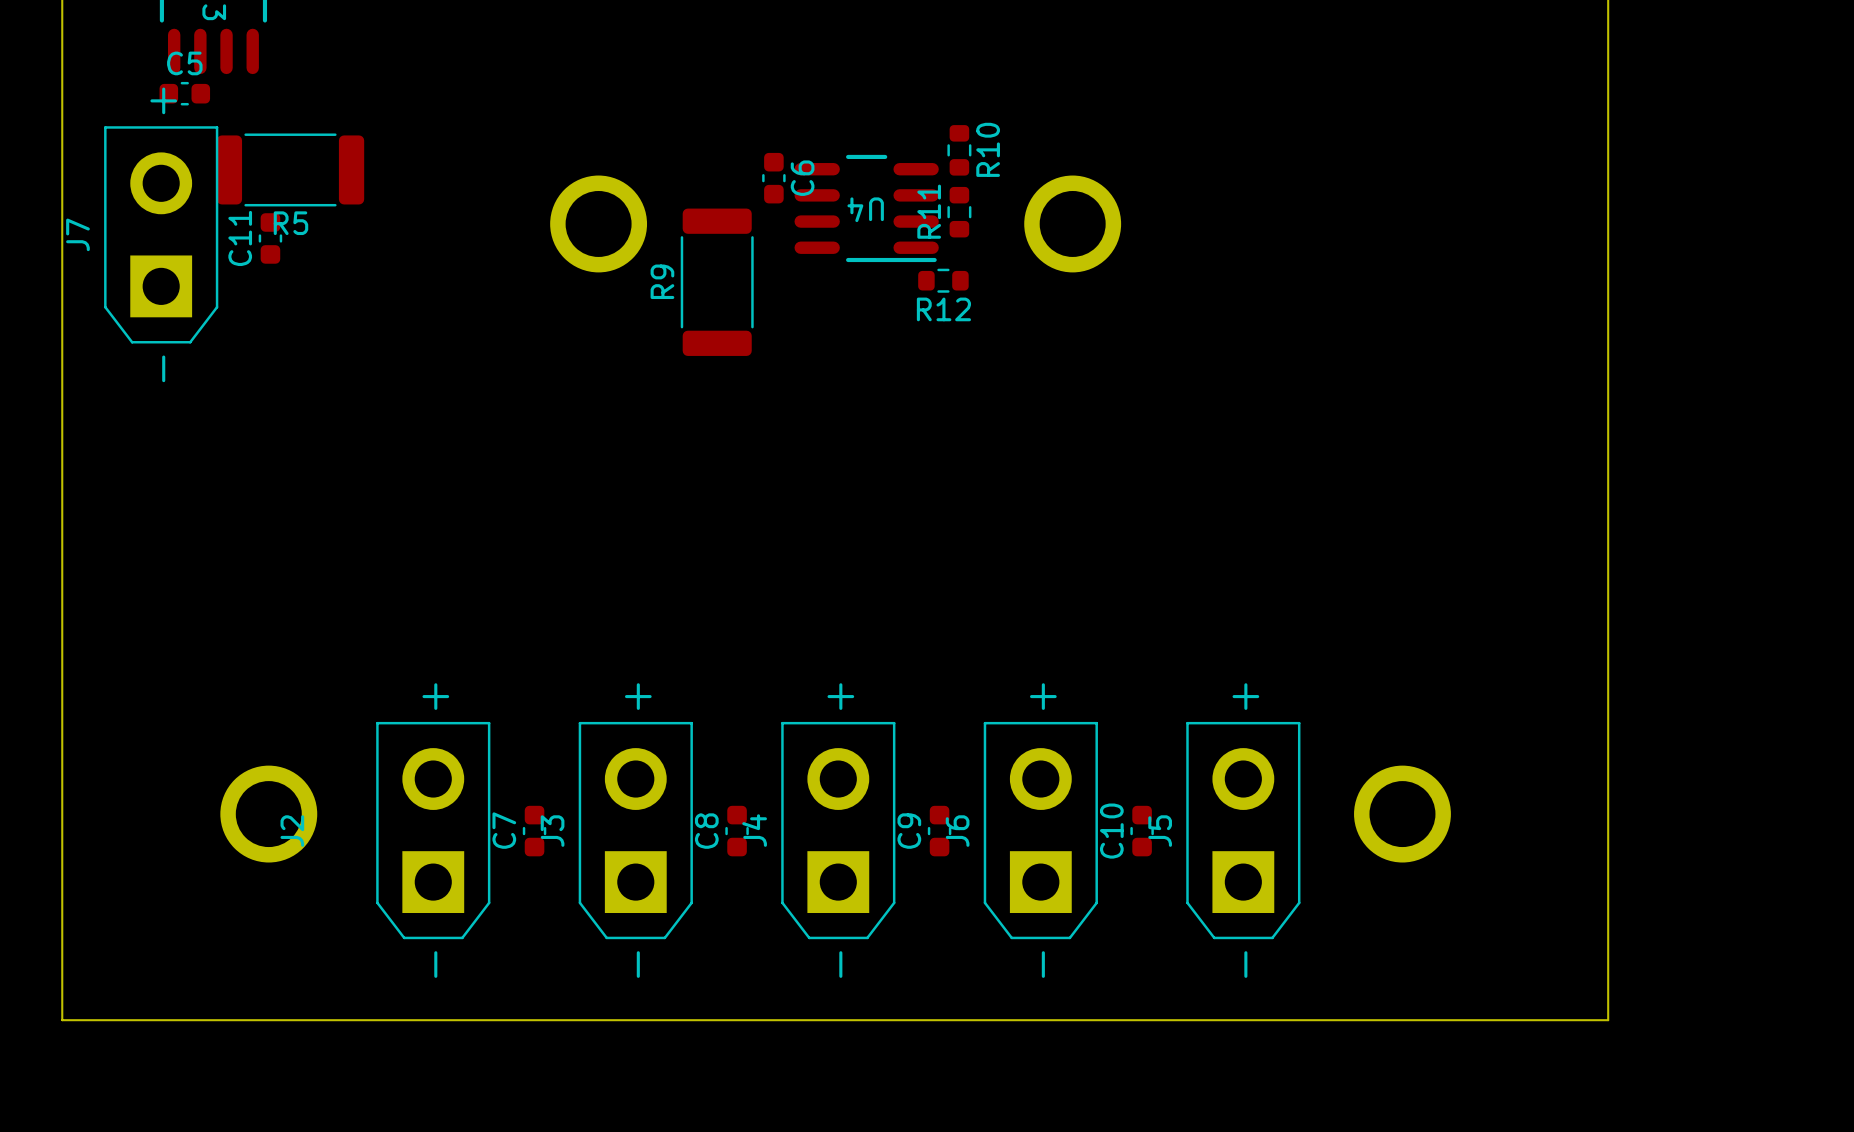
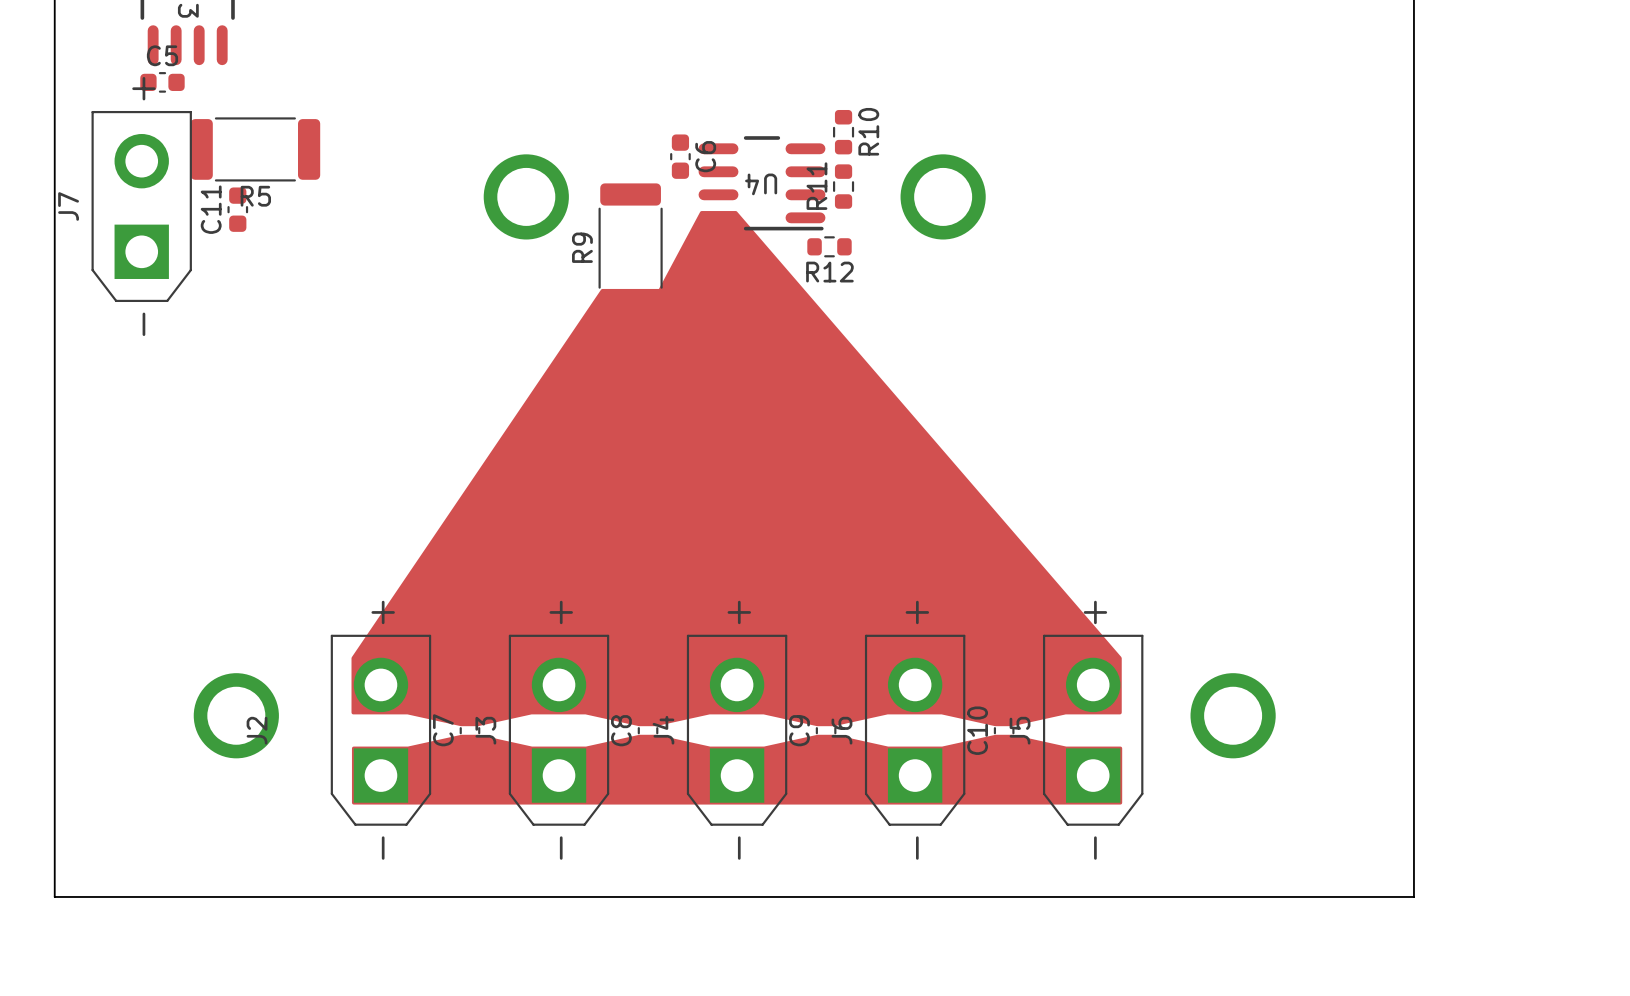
drawing: none -> [351, 211, 1123, 805]

